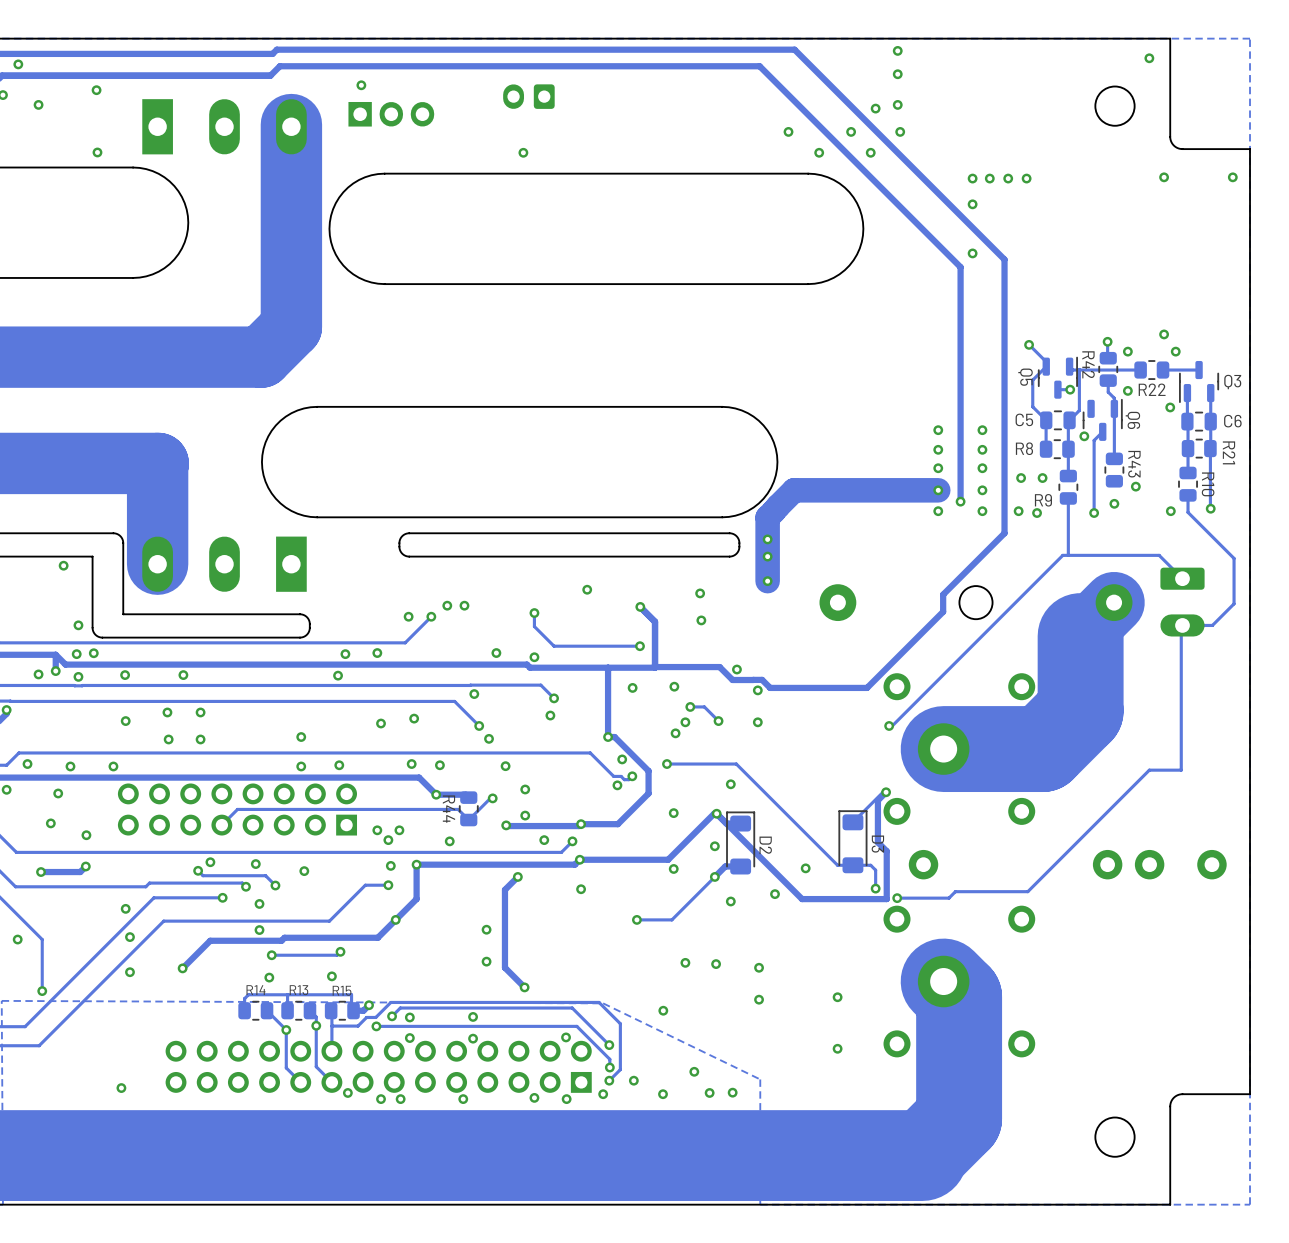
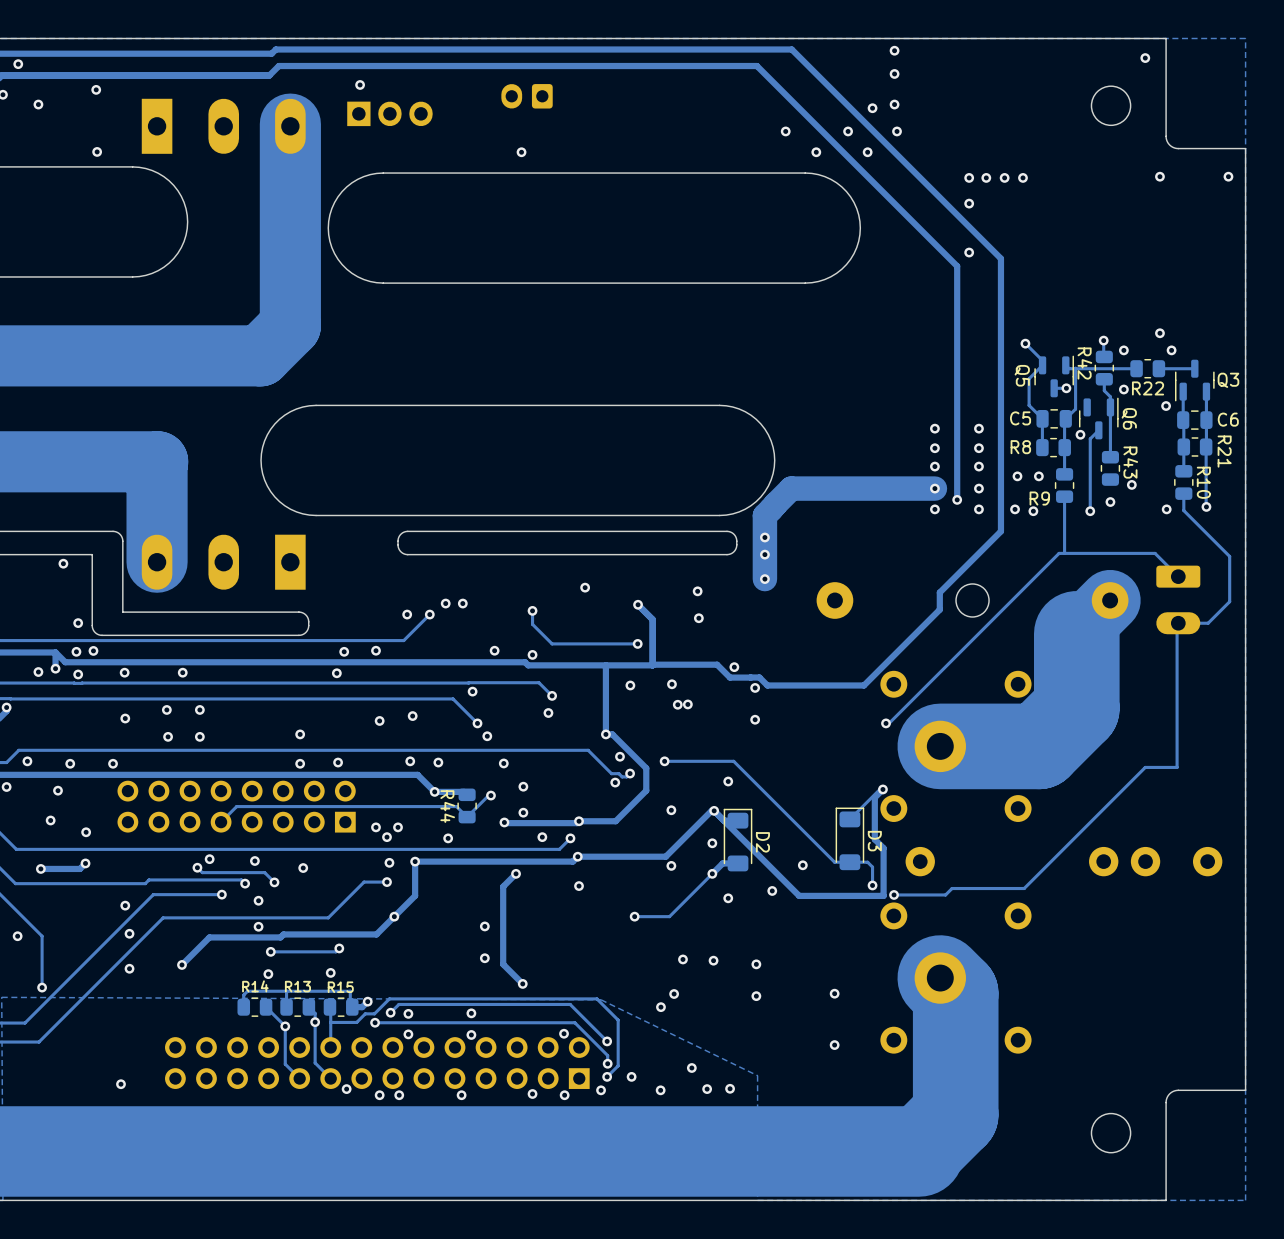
track: (690, 706) (704, 706) (718, 721) -> none
via: none -> (677, 704)
via: (718, 721) -> none
via: (685, 722) -> none
via: (675, 733) -> none
via: none -> (674, 994)

